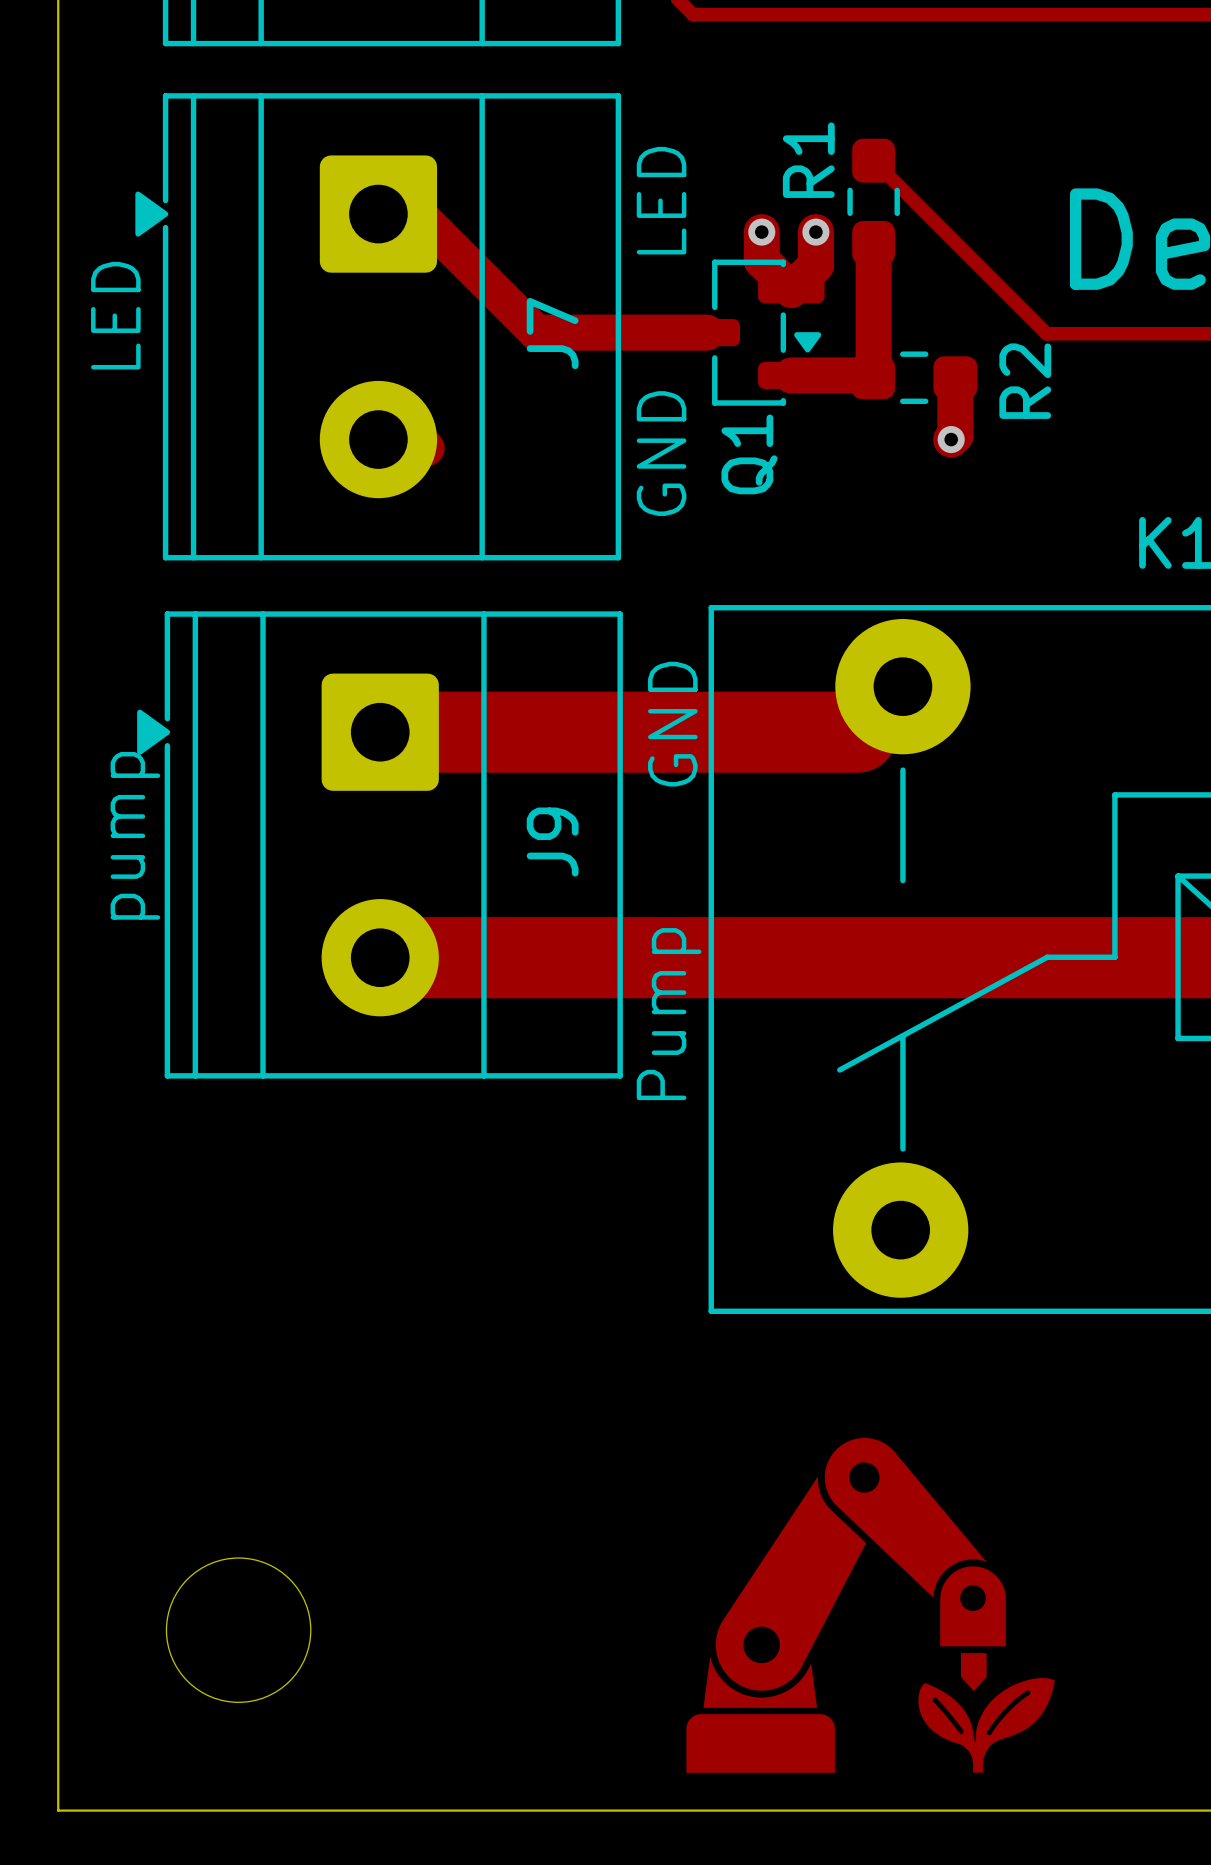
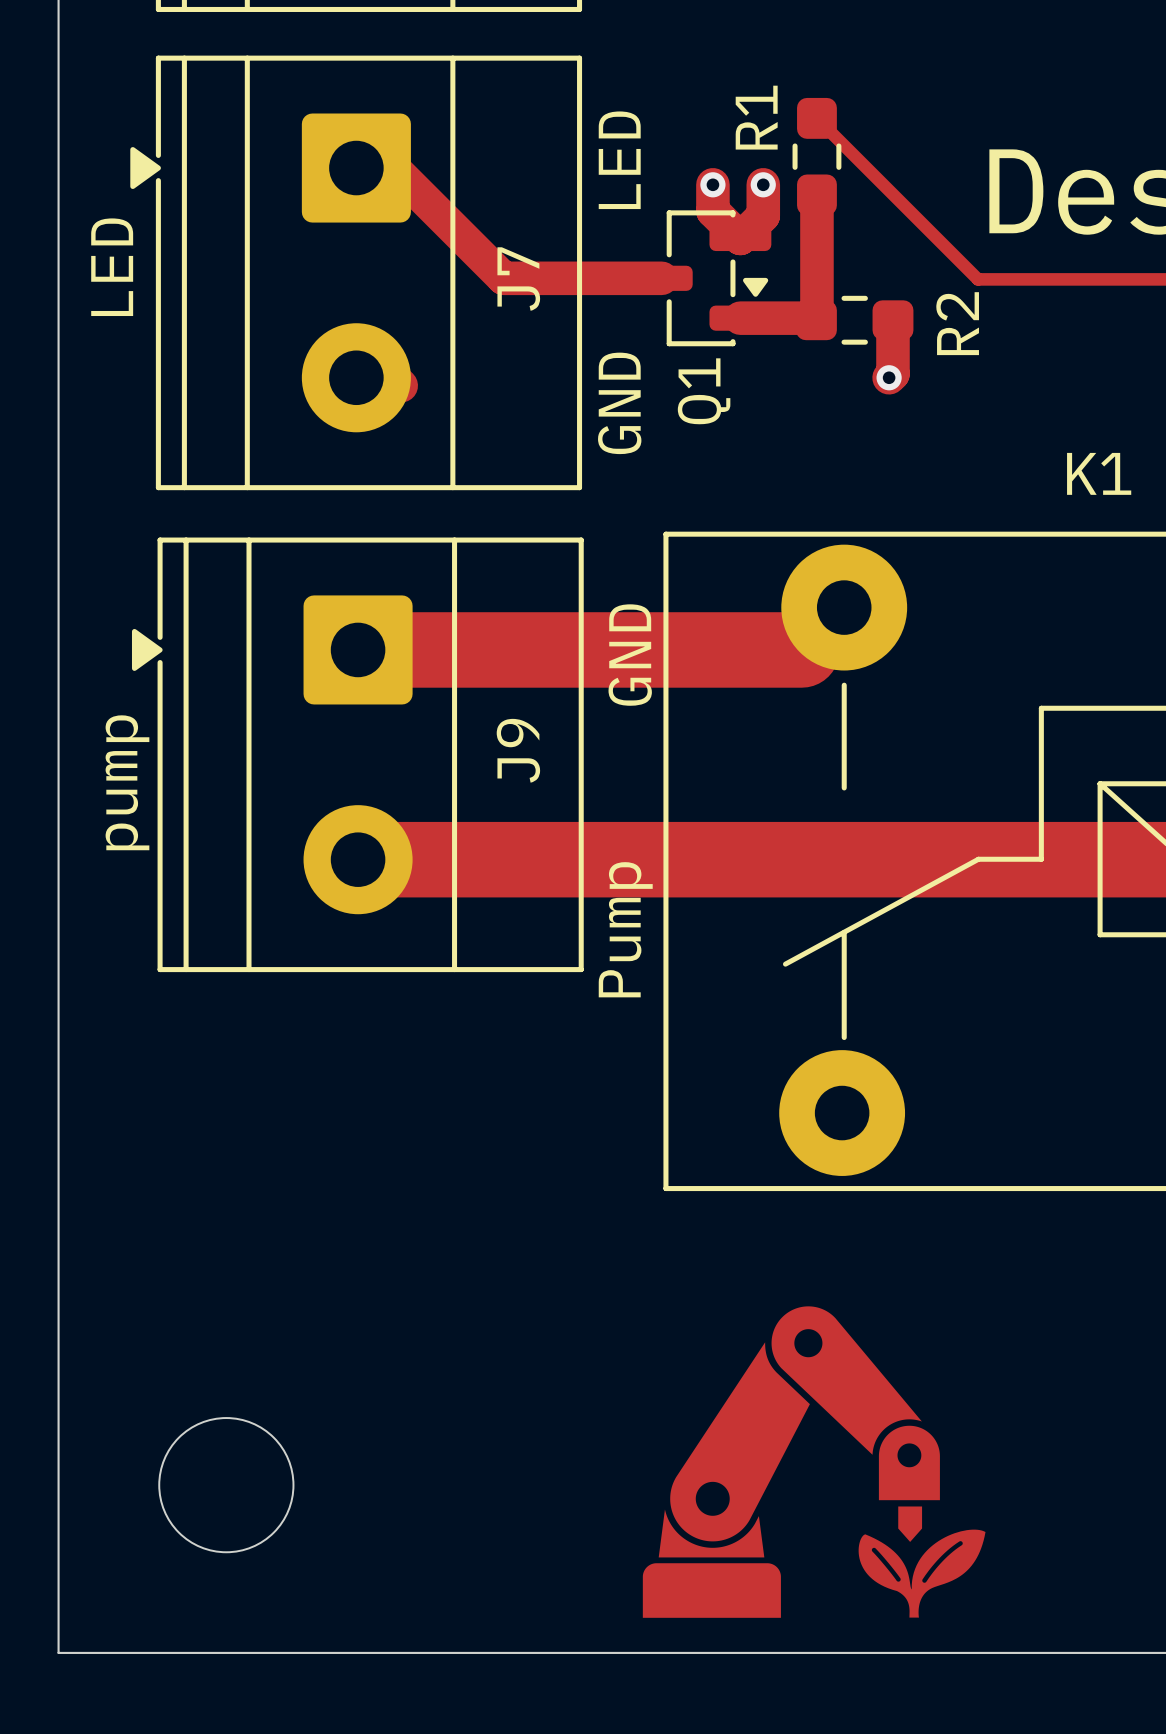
text position: pump (135, 835) -> pump (127, 782)

